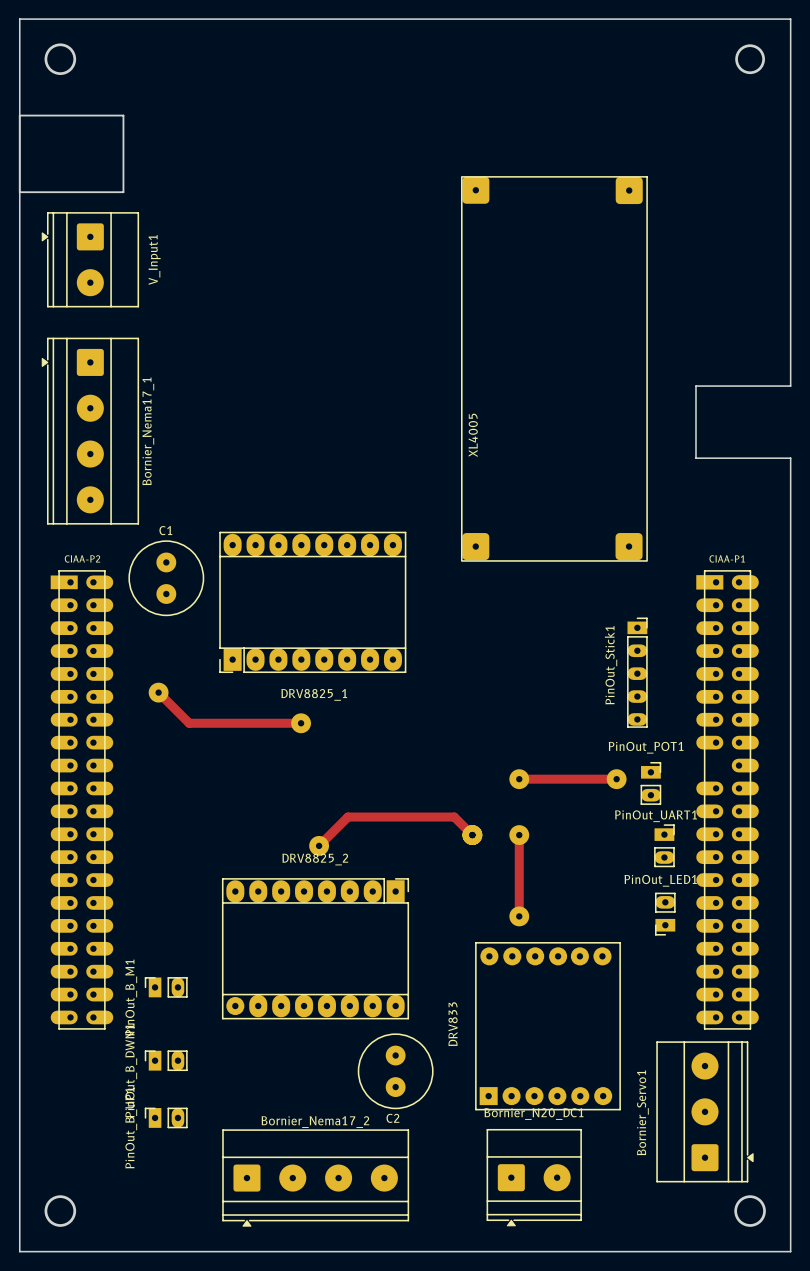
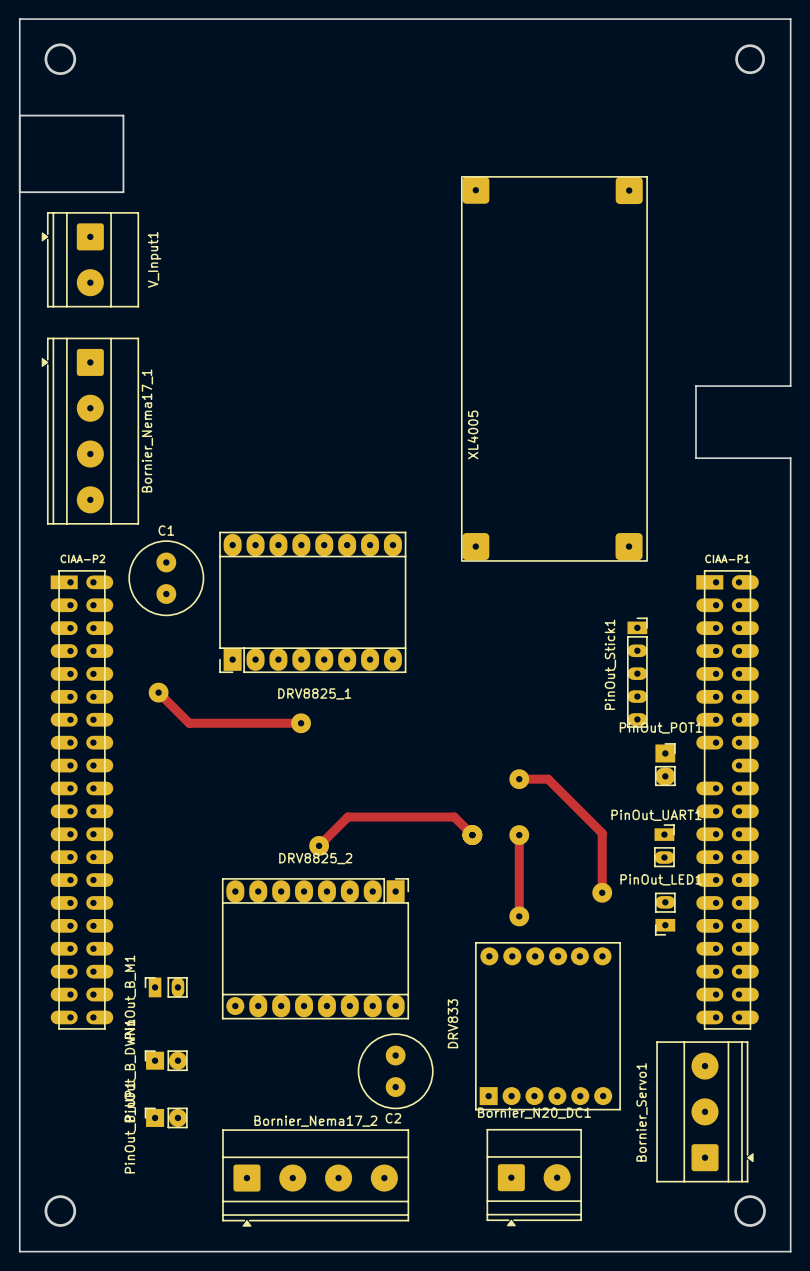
PinOut_POT1 footprint: [640, 762, 662, 805] -> [655, 743, 676, 786]
track: (548, 779) (616, 779) -> (548, 779) (602, 833) (602, 892)
part position: (616, 779) -> (602, 892)
PinOut_B_DWN1 footprint: [144, 1050, 188, 1071] -> [144, 1050, 188, 1071]
PinOut_B_UP1 footprint: [144, 1107, 188, 1129] -> [144, 1107, 188, 1129]

